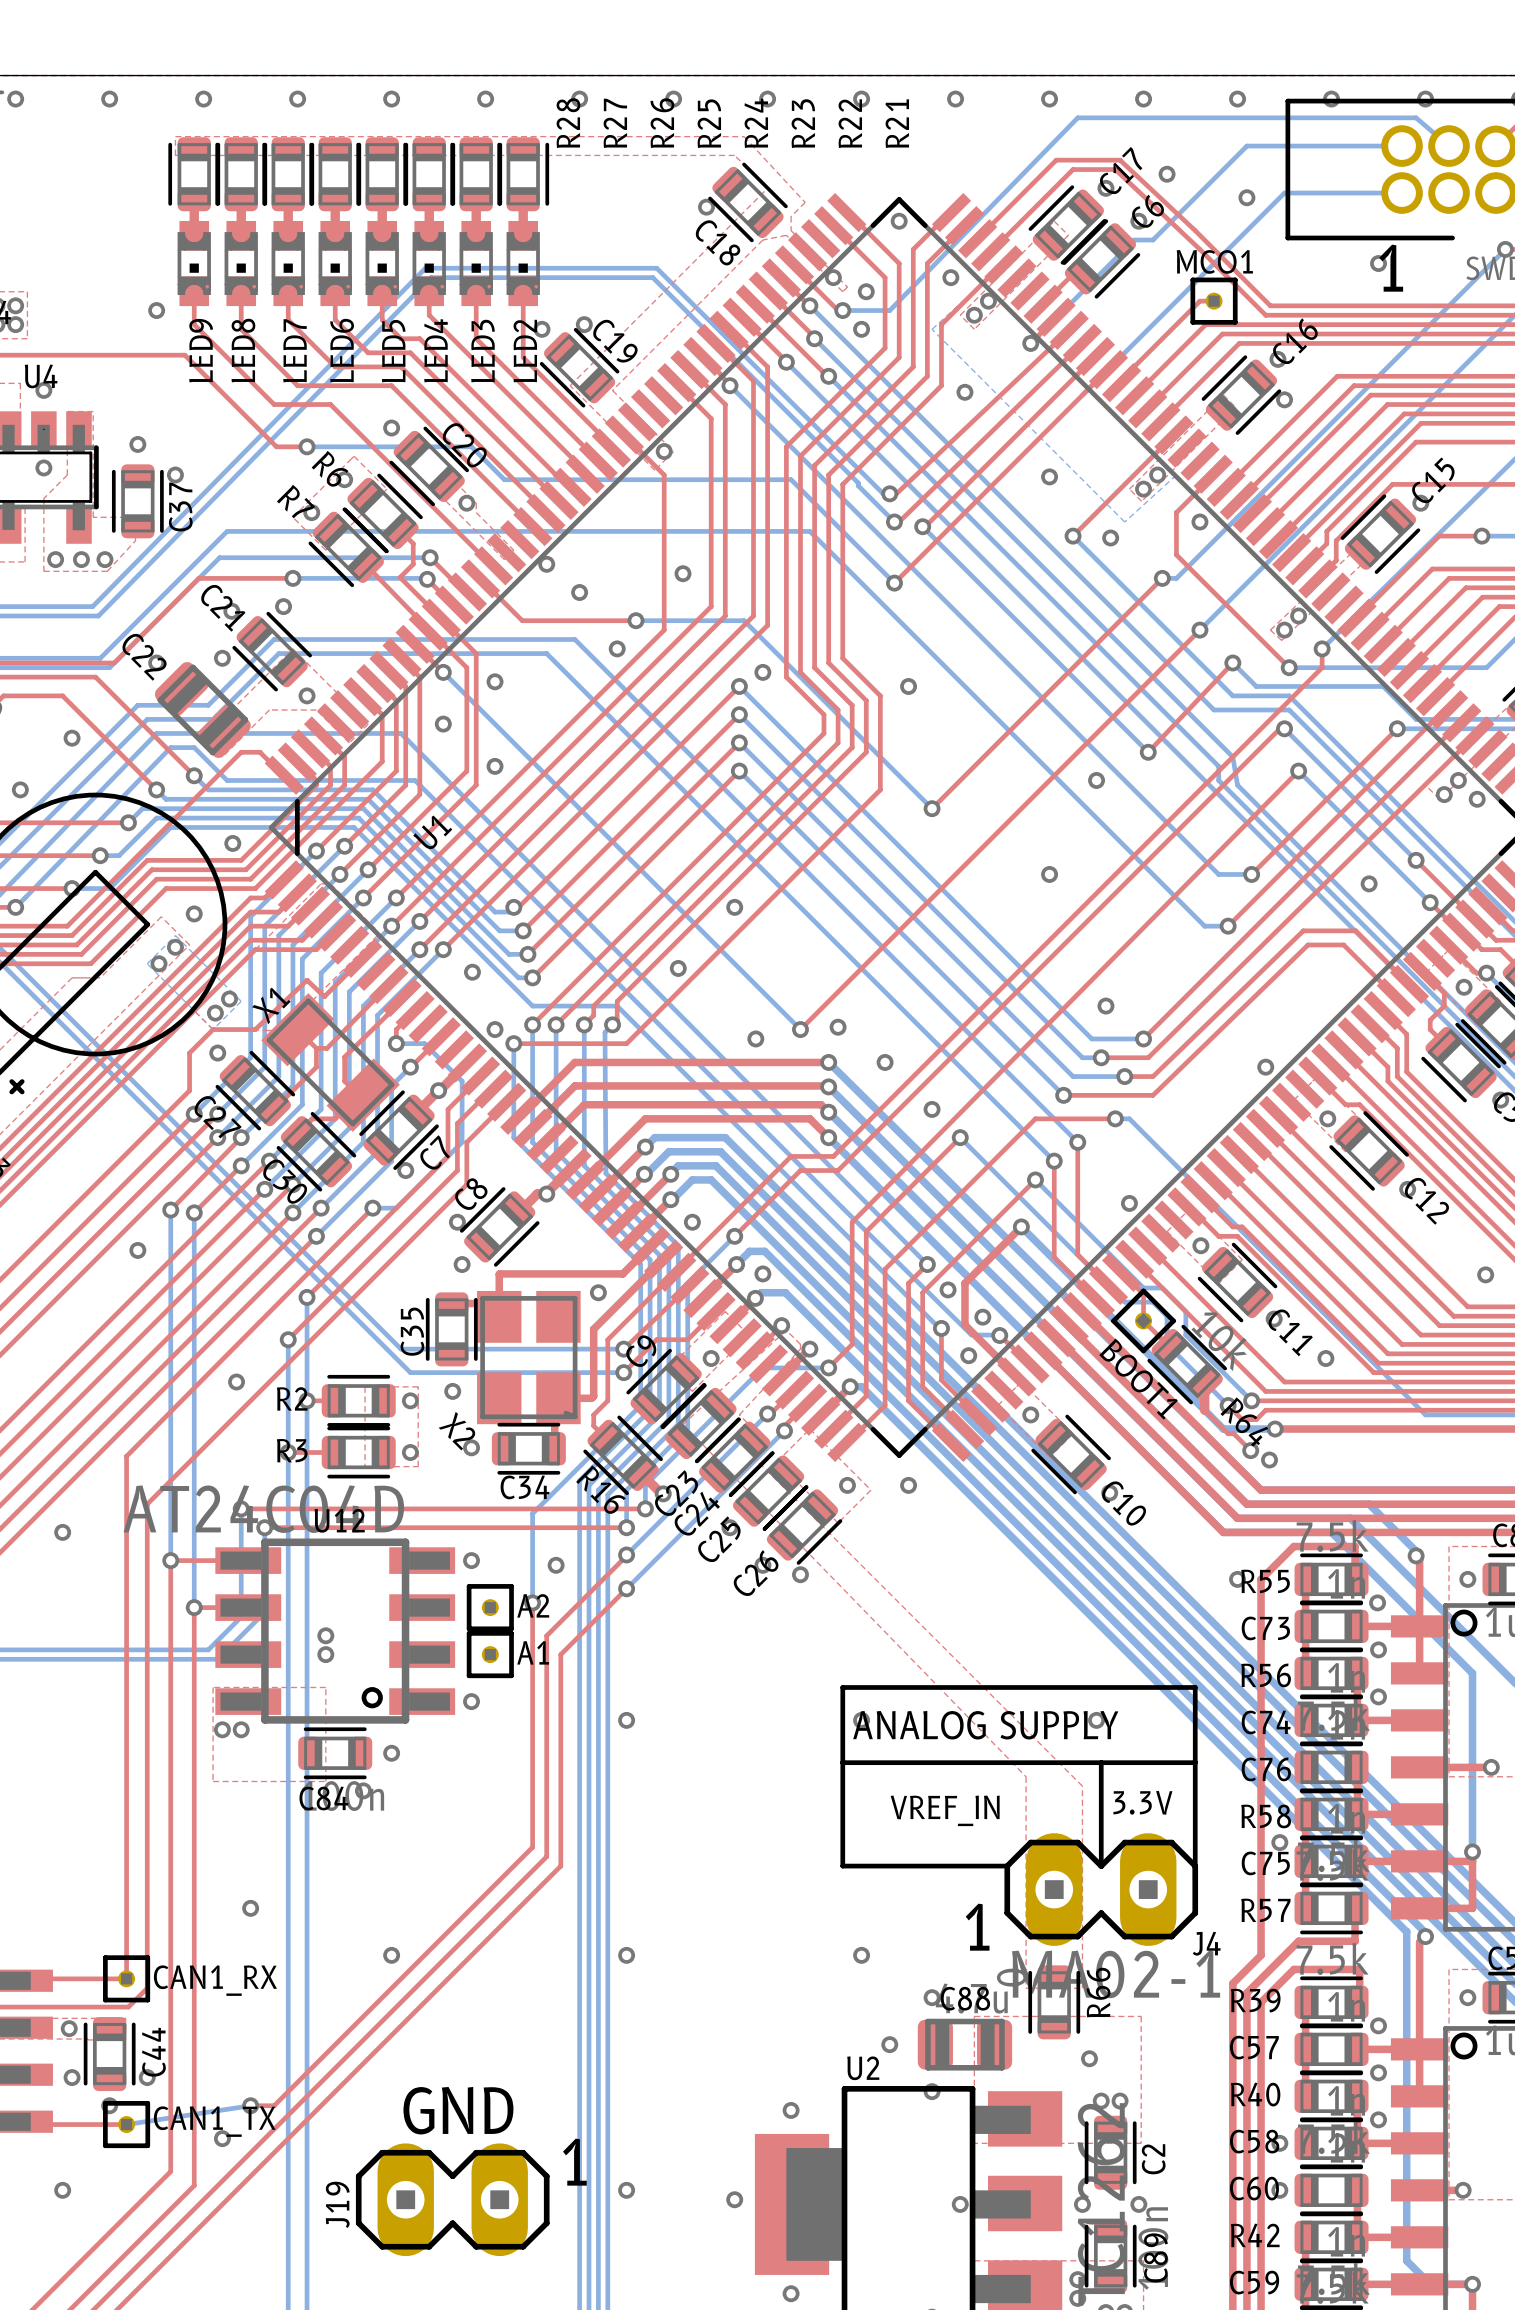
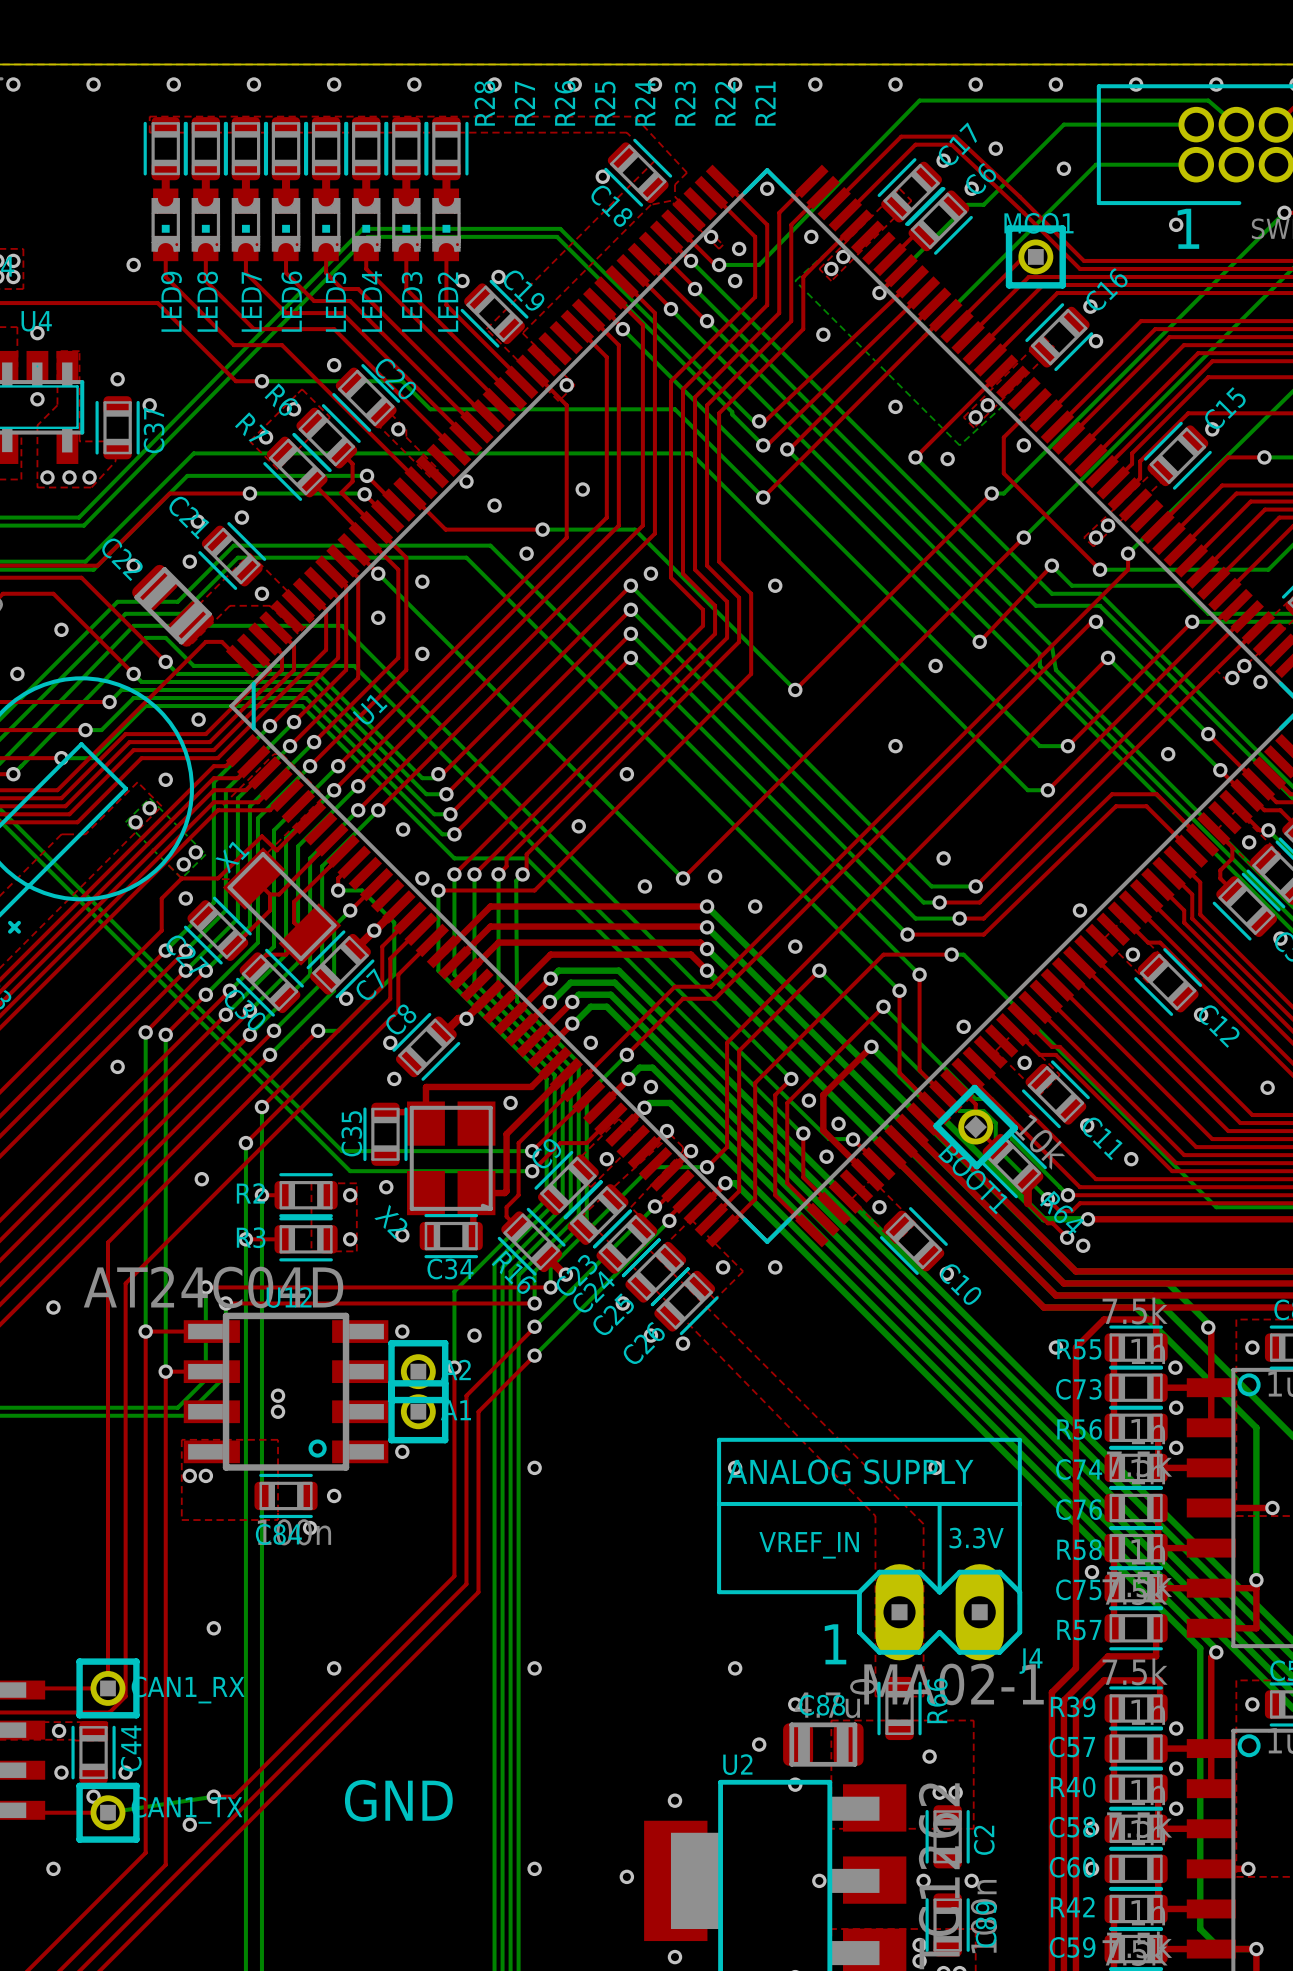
MCO1 footprint: [1190, 277, 1238, 325] -> [1005, 225, 1066, 289]
BOOT1 footprint: [1111, 1288, 1176, 1354] -> [933, 1084, 1018, 1170]
A2 footprint: [466, 1584, 514, 1632] -> [388, 1340, 449, 1404]
A1 footprint: [466, 1631, 514, 1679] -> [388, 1380, 449, 1444]
CAN1_RX footprint: [103, 1955, 151, 2003] -> [76, 1658, 140, 1719]
CAN1_TX footprint: [103, 2100, 151, 2149] -> [76, 1782, 140, 1843]
J19: (452, 2199) -> none

